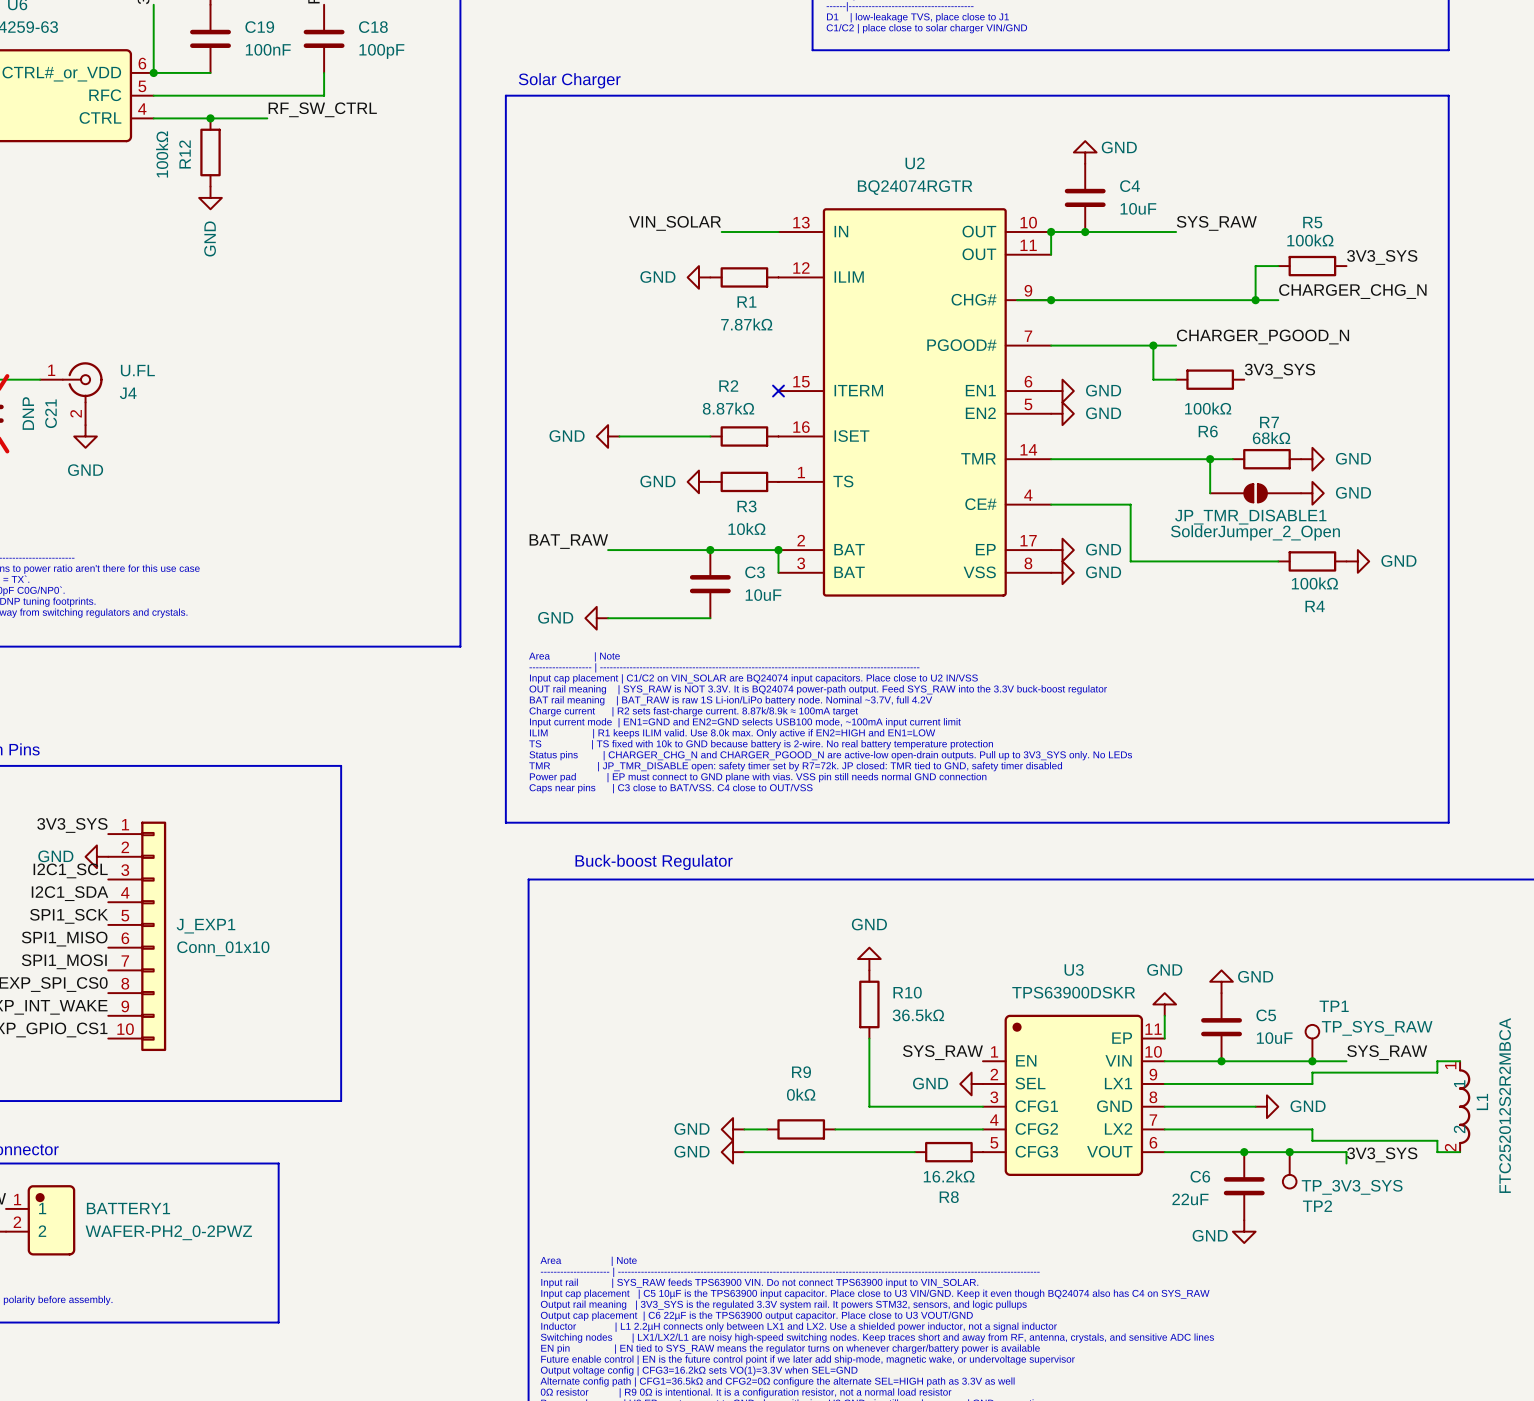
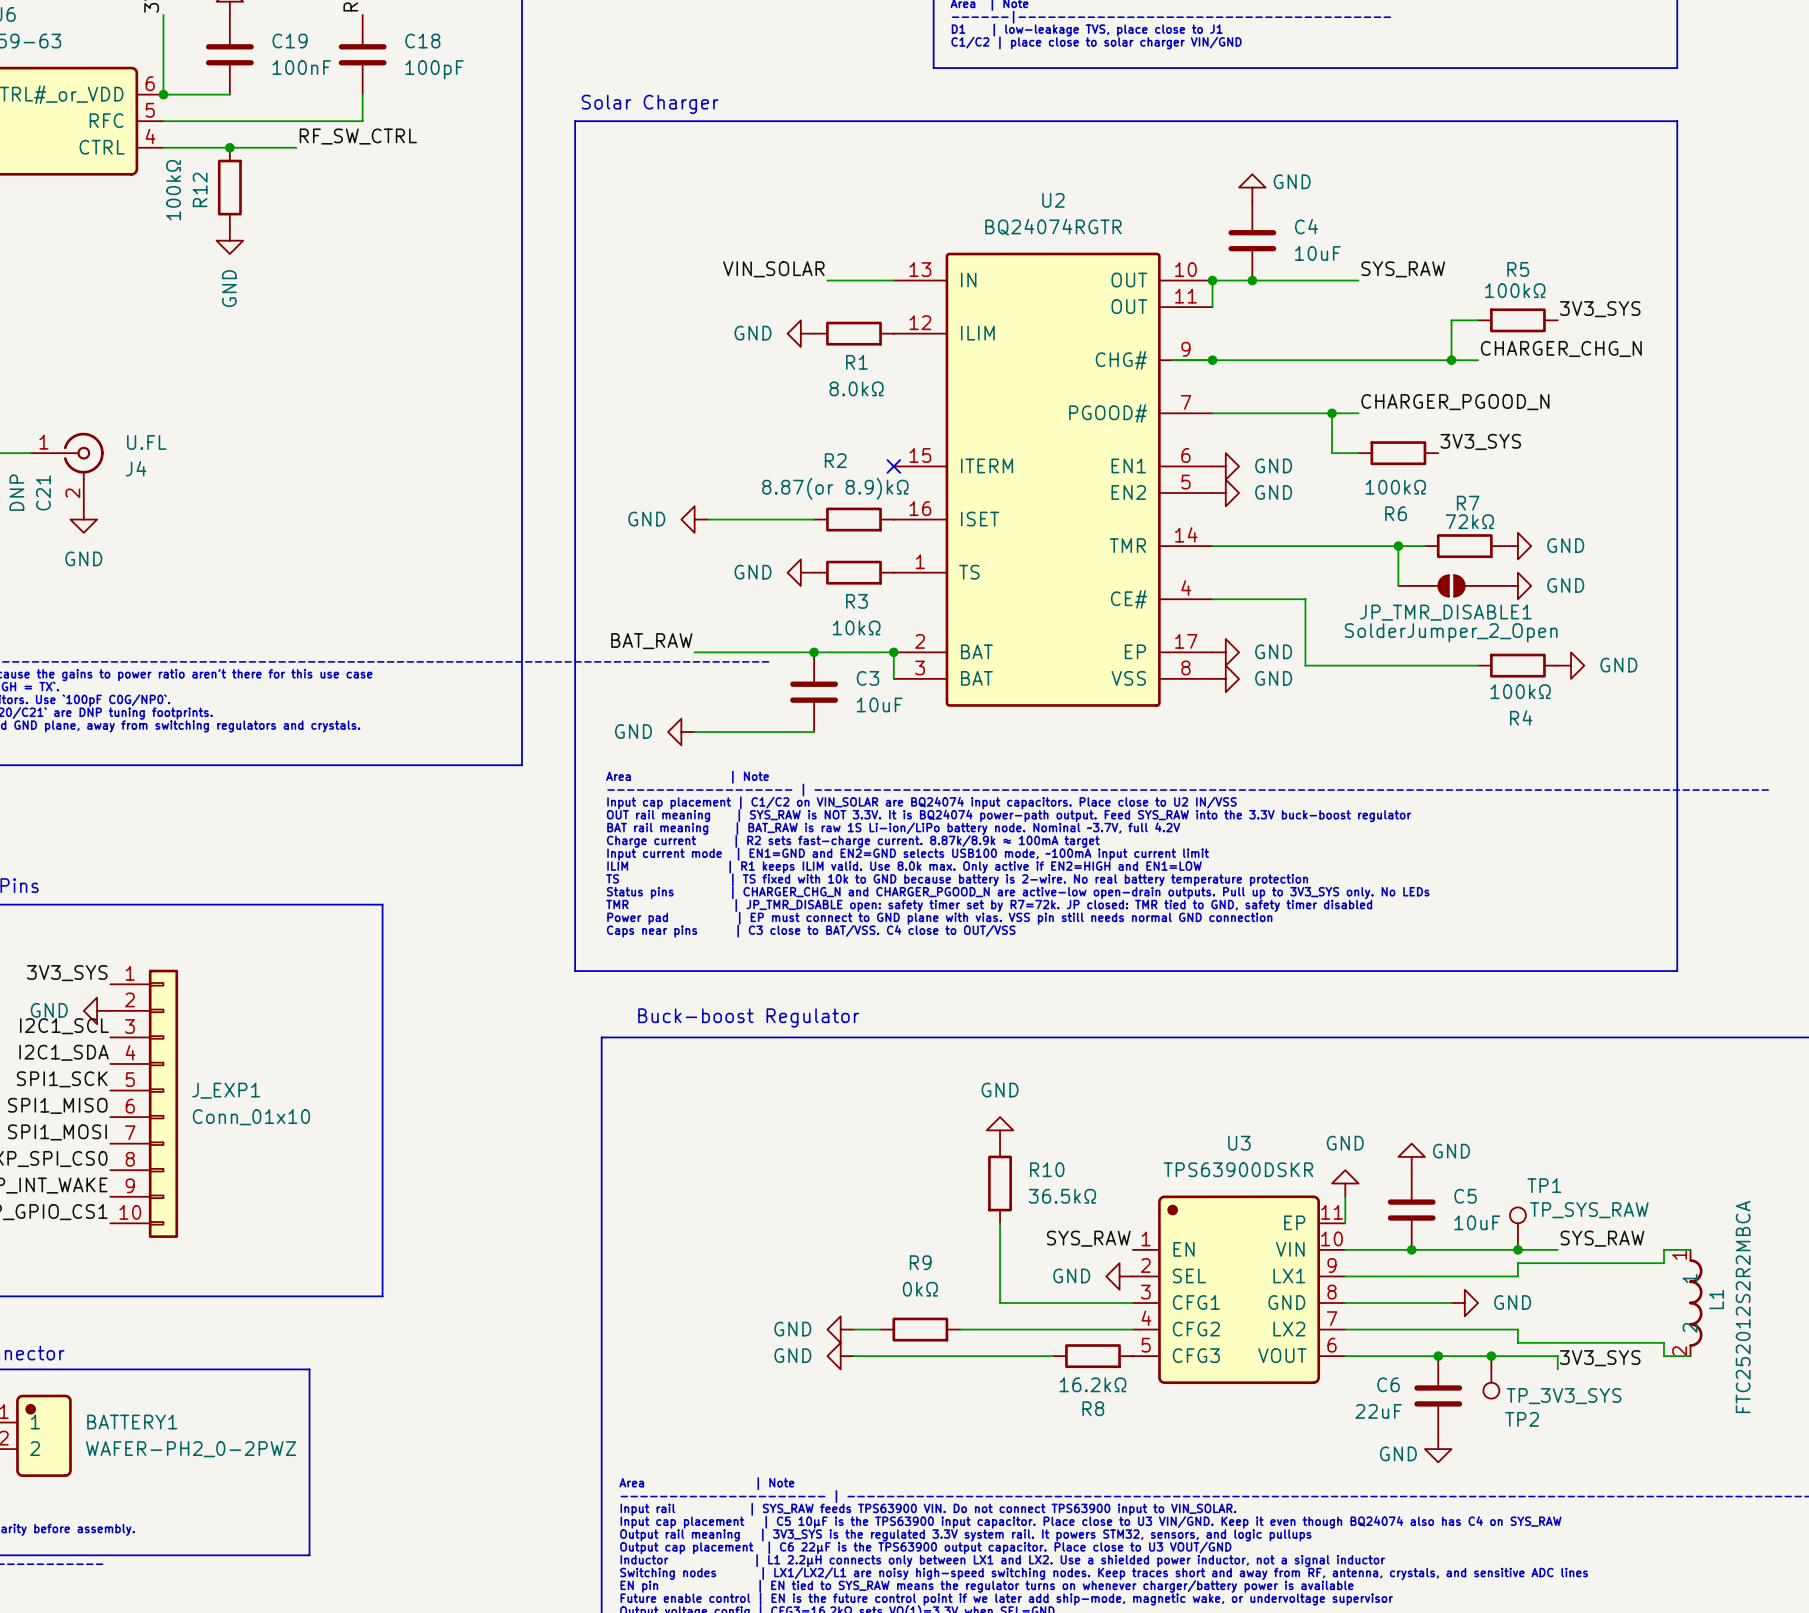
R1 value: 7.87kΩ (746, 324) -> 8.0kΩ (856, 388)
R2 value: 8.87kΩ (728, 408) -> 8.87(or 8.9)kΩ (835, 488)
R7 value: 68kΩ (1271, 438) -> 72kΩ (1469, 521)

